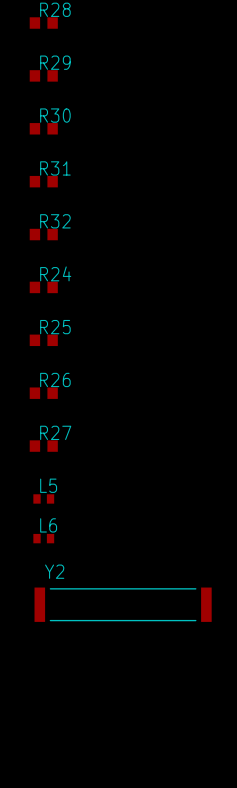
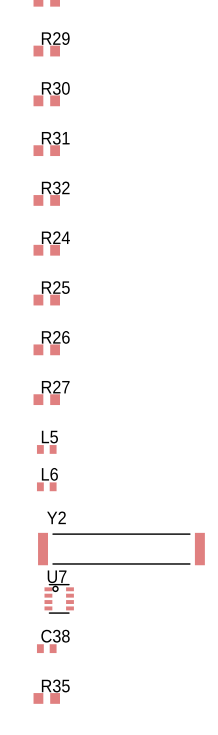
U7: none -> (59, 598)
C38: none -> (46, 648)
R35: none -> (46, 698)

